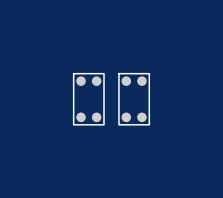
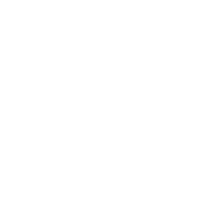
part: (88, 99) -> none
part: (134, 99) -> none

